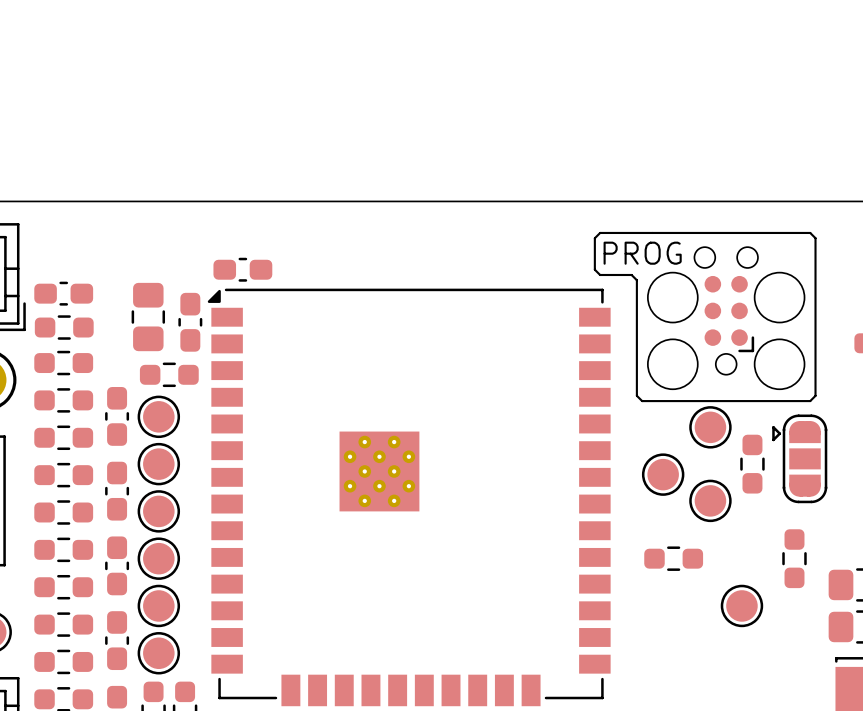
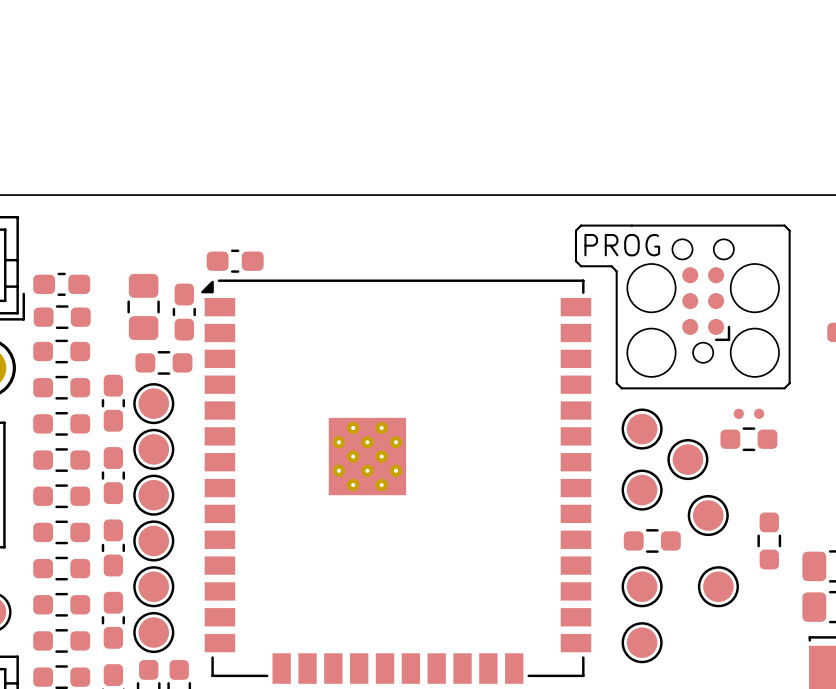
part: (710, 427) -> none
part: none -> (748, 413)
part: none -> (642, 429)
part: (799, 458) -> none
part rotation: 0° (752, 464) -> 90° clockwise (748, 439)
part: (663, 474) -> none
part: none -> (687, 459)
part: (710, 500) -> none
part: none -> (642, 490)
part: none -> (708, 515)
part: none -> (642, 586)
part: none -> (642, 642)

